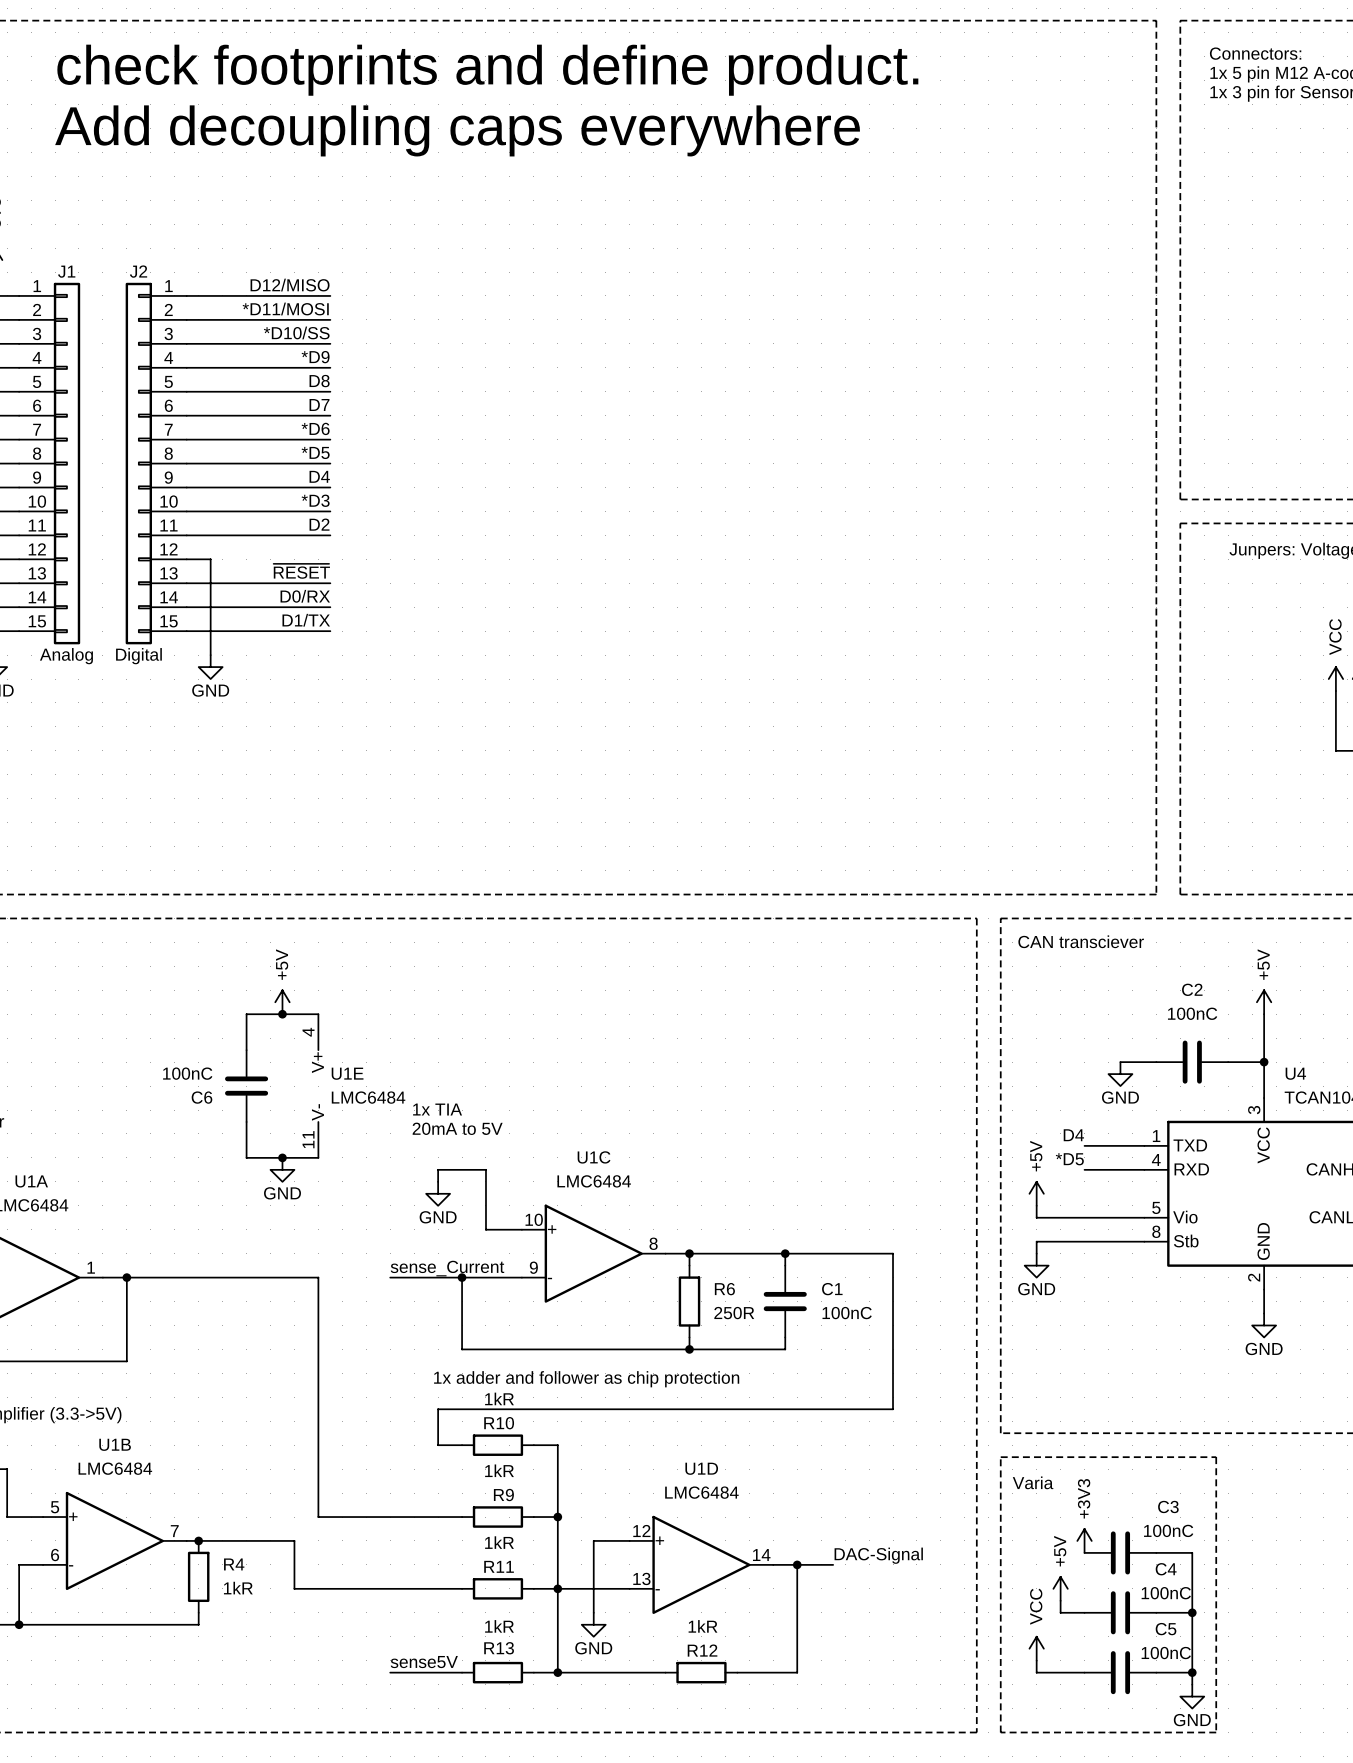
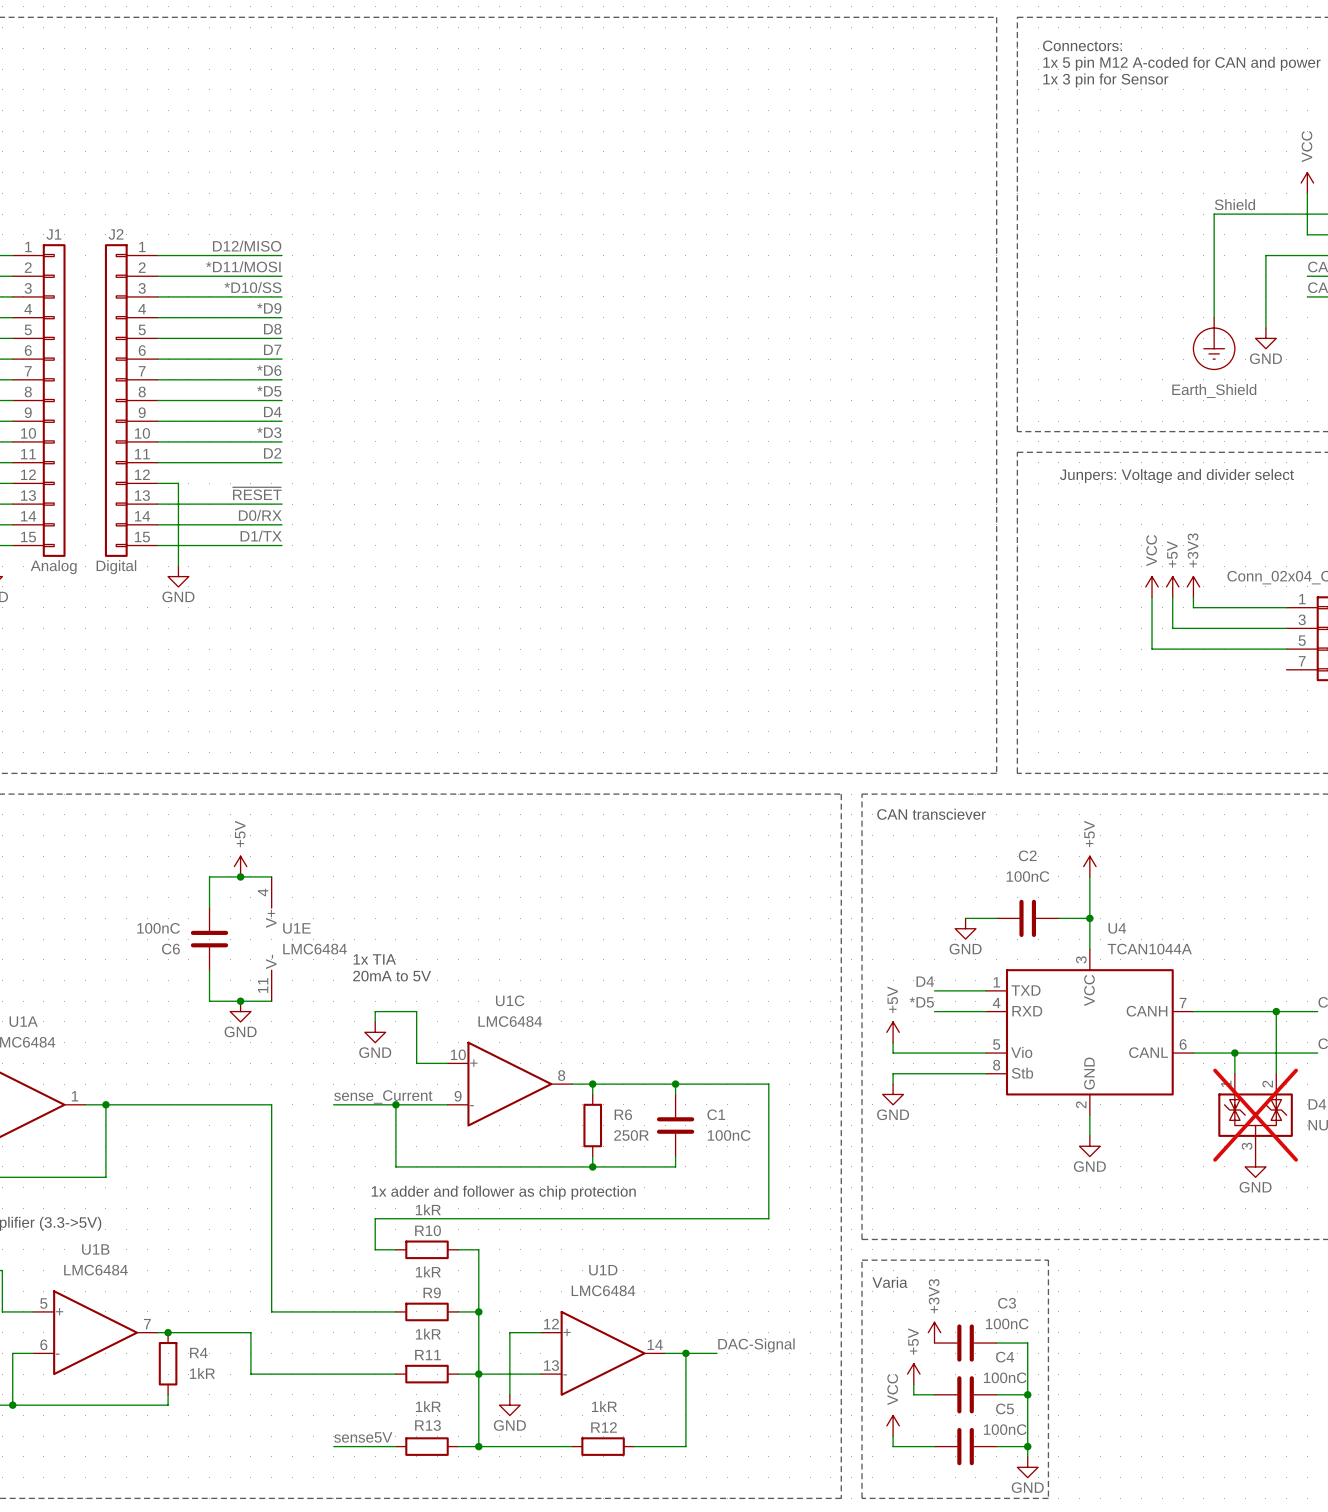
text: check footprints and define product. (487, 70) -> none
text: Add decoupling caps everywhere (457, 130) -> none

